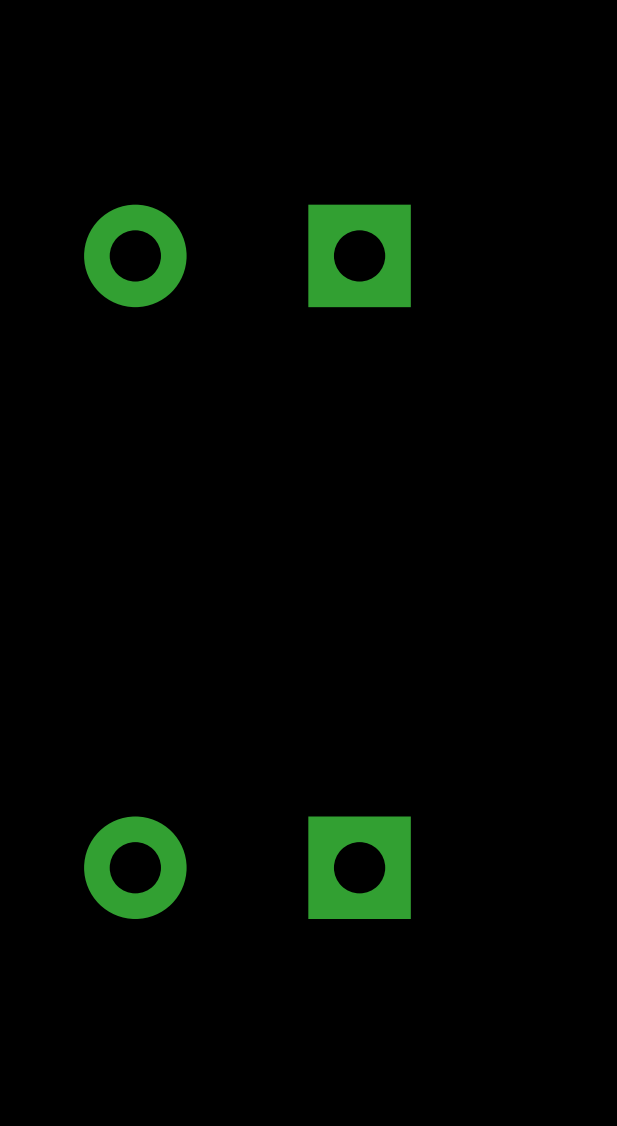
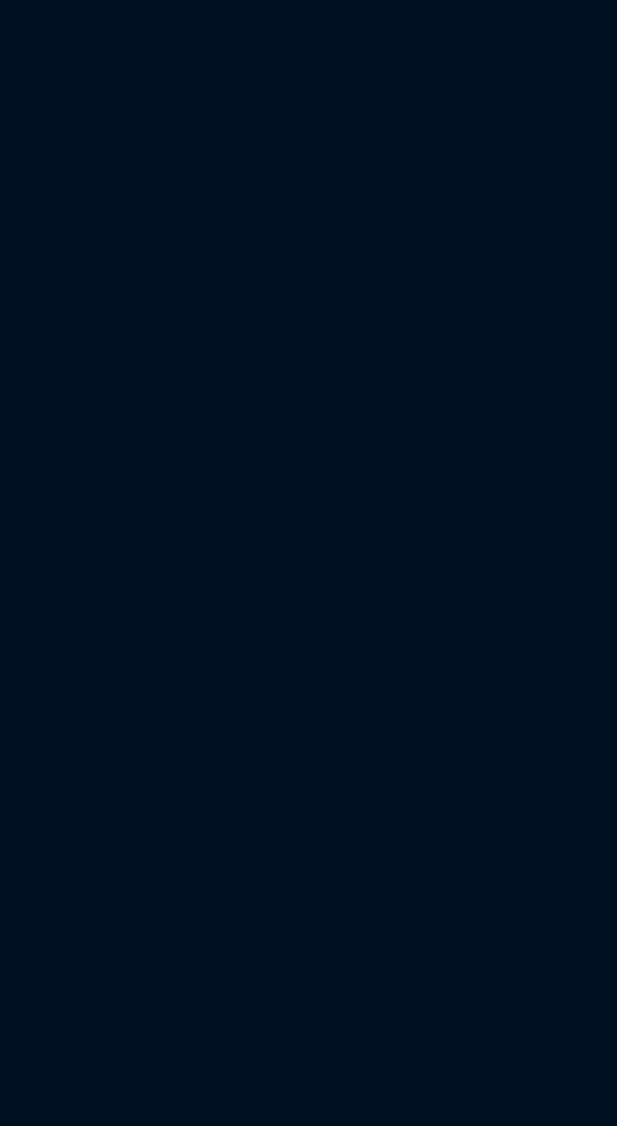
part: (247, 255) -> none
part: (247, 867) -> none

